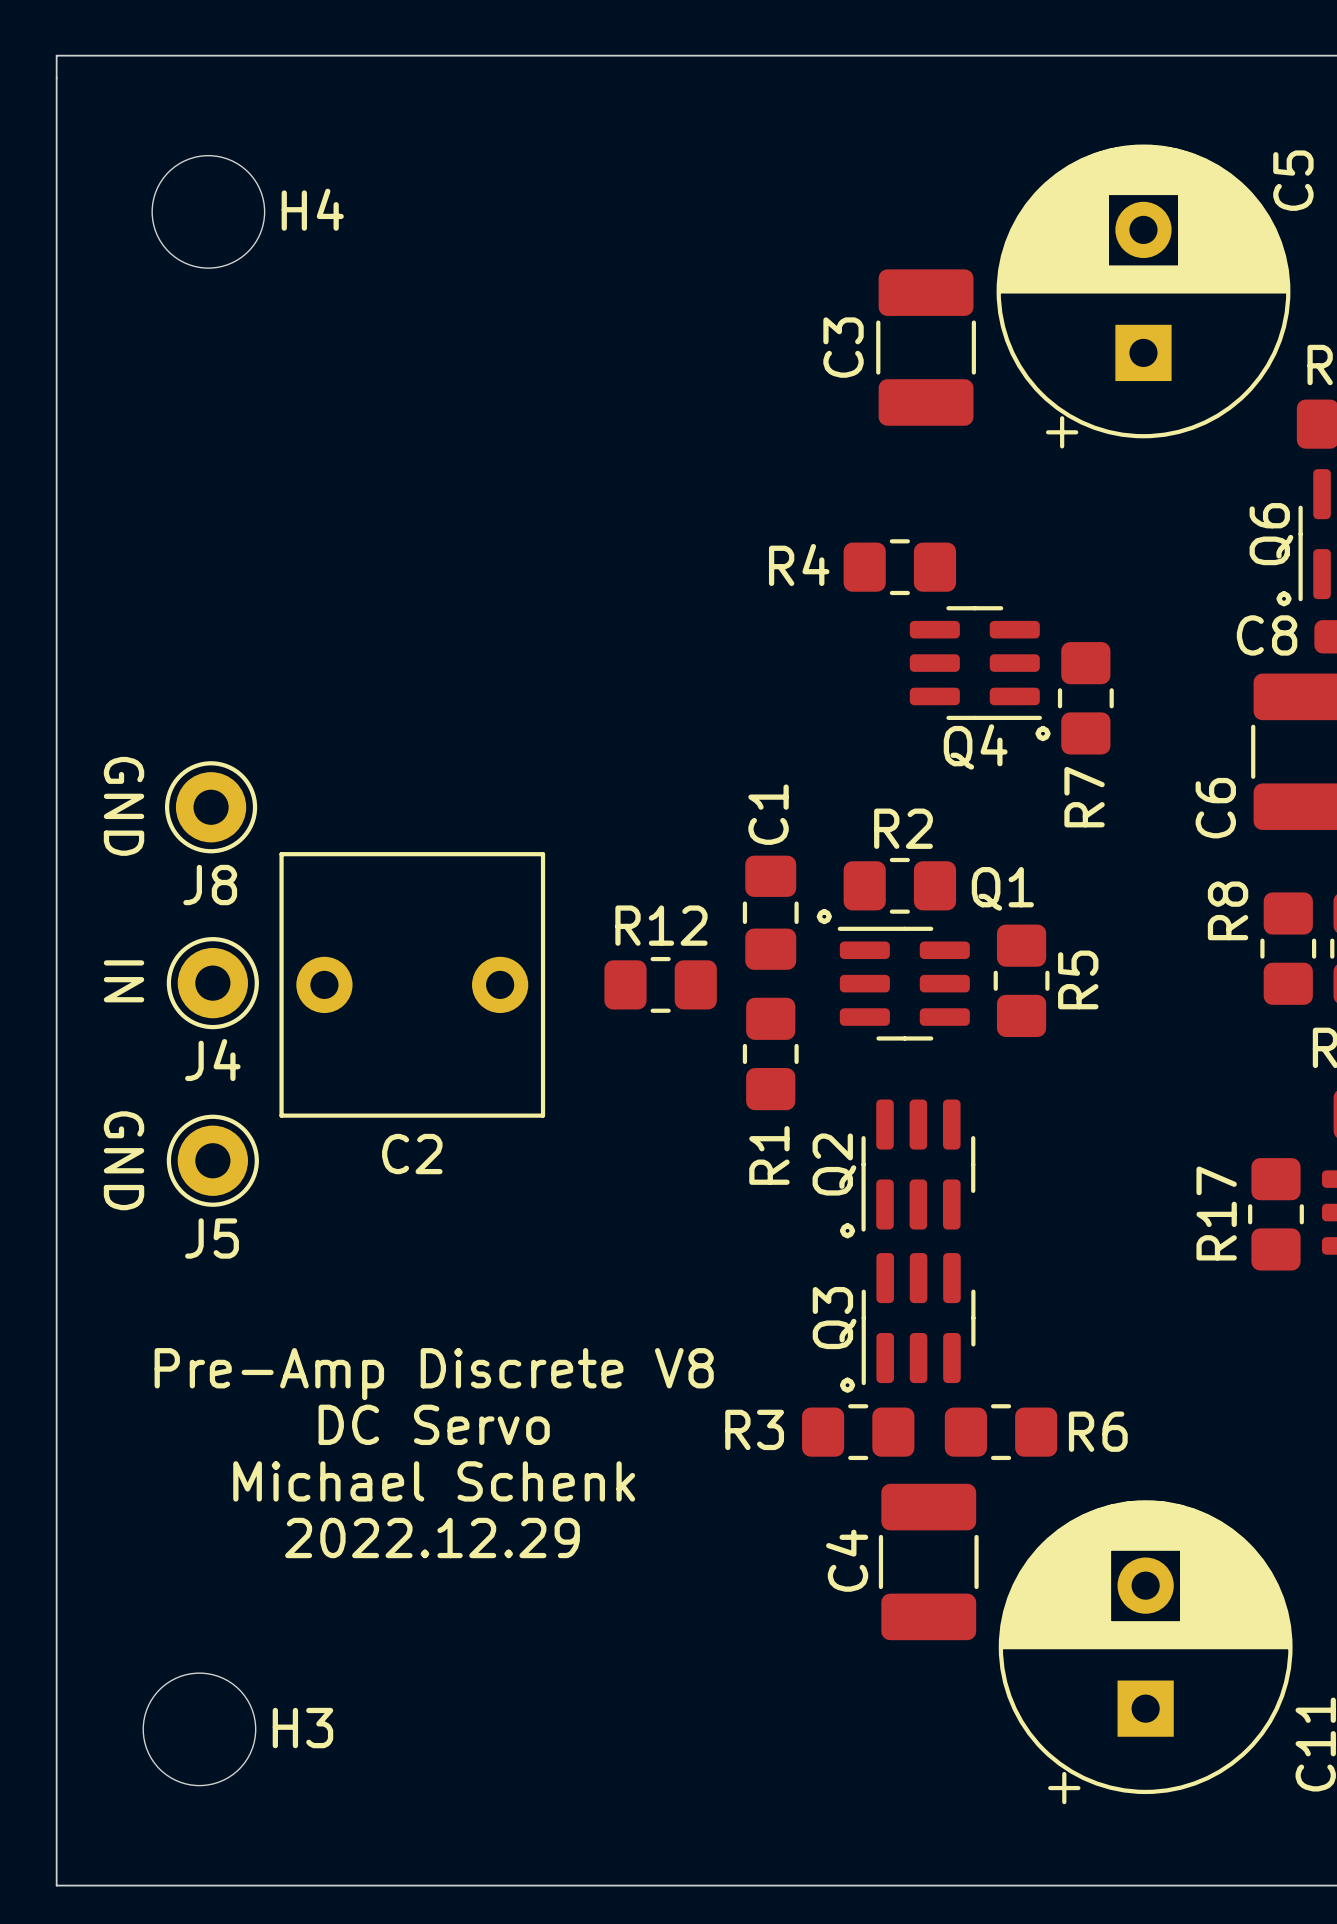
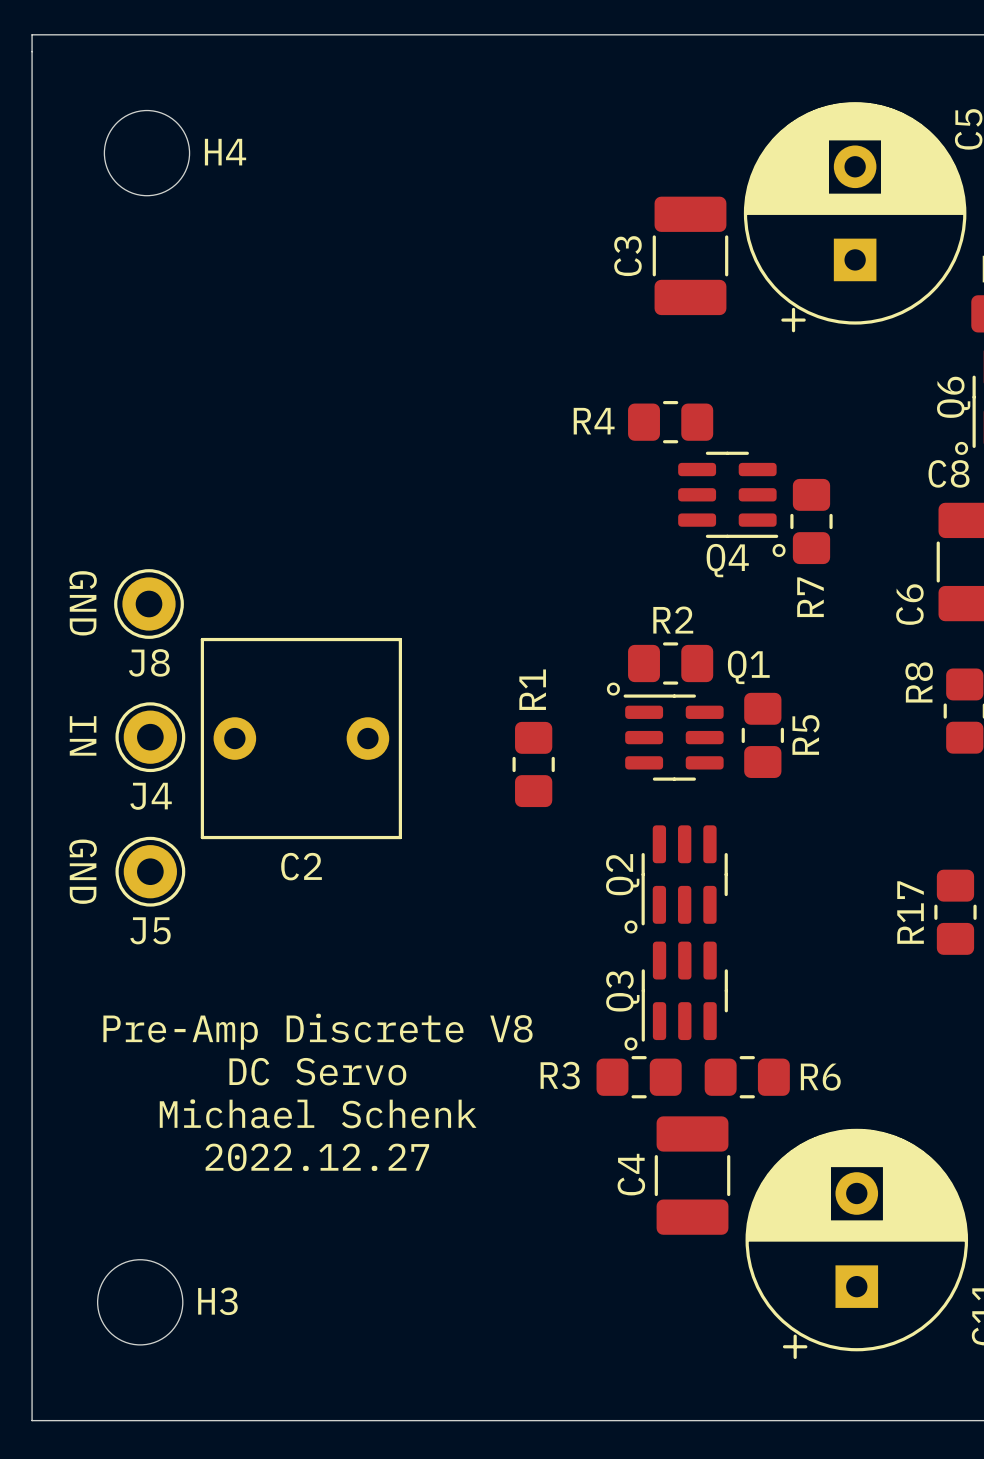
C1: (770, 912) -> none
R12: (660, 984) -> none
R1 position: (770, 1053) -> (533, 764)
R1 name position: R1 (769, 1155) -> R1 (532, 689)
text: 2022.12.29 (432, 1537) -> 2022.12.27 (317, 1157)

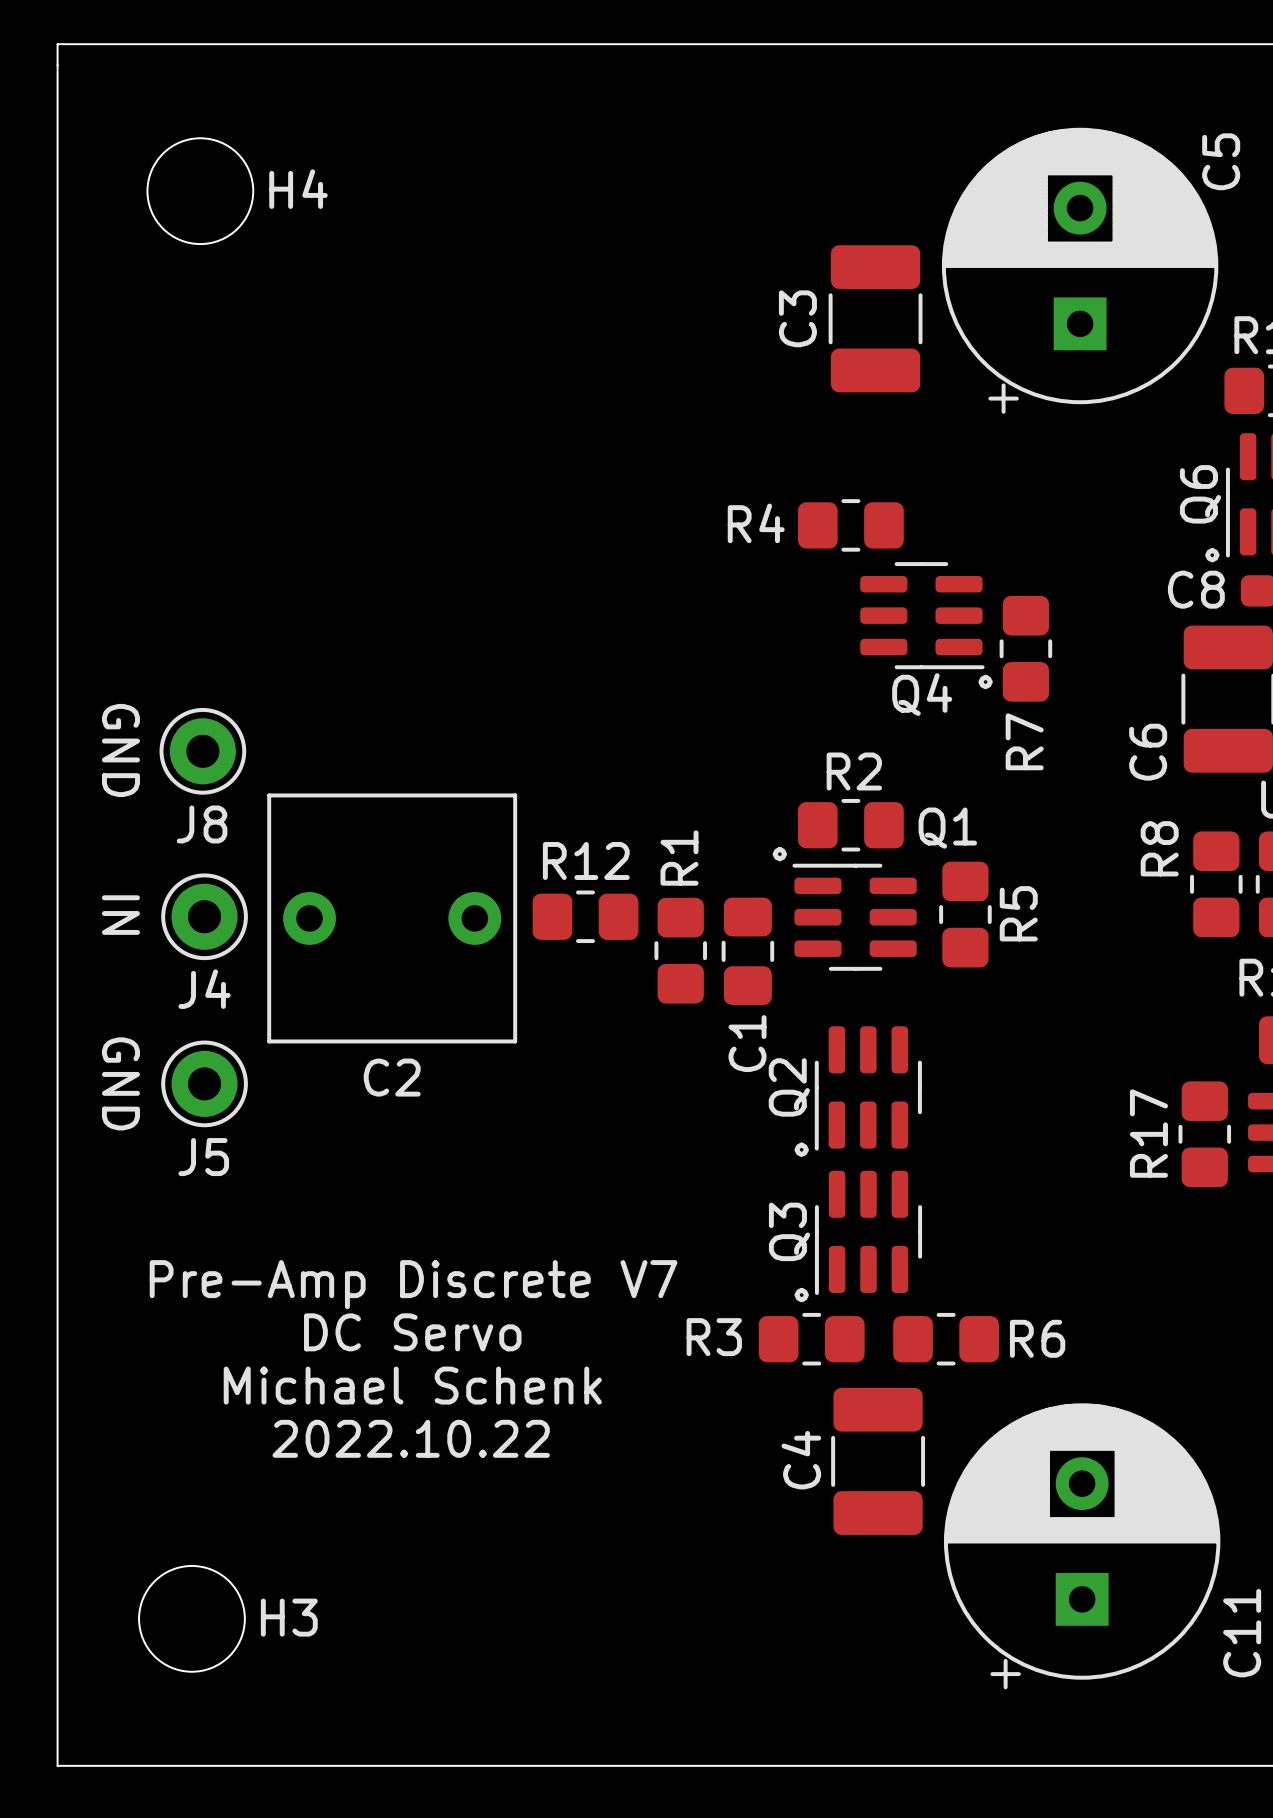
R12: none -> (585, 916)
C1: none -> (747, 951)
text: Pre-Amp Discrete V8 (317, 1031) -> Pre-Amp Discrete V7 (413, 1284)
text: 2022.12.27 (317, 1157) -> 2022.10.22 (411, 1438)

